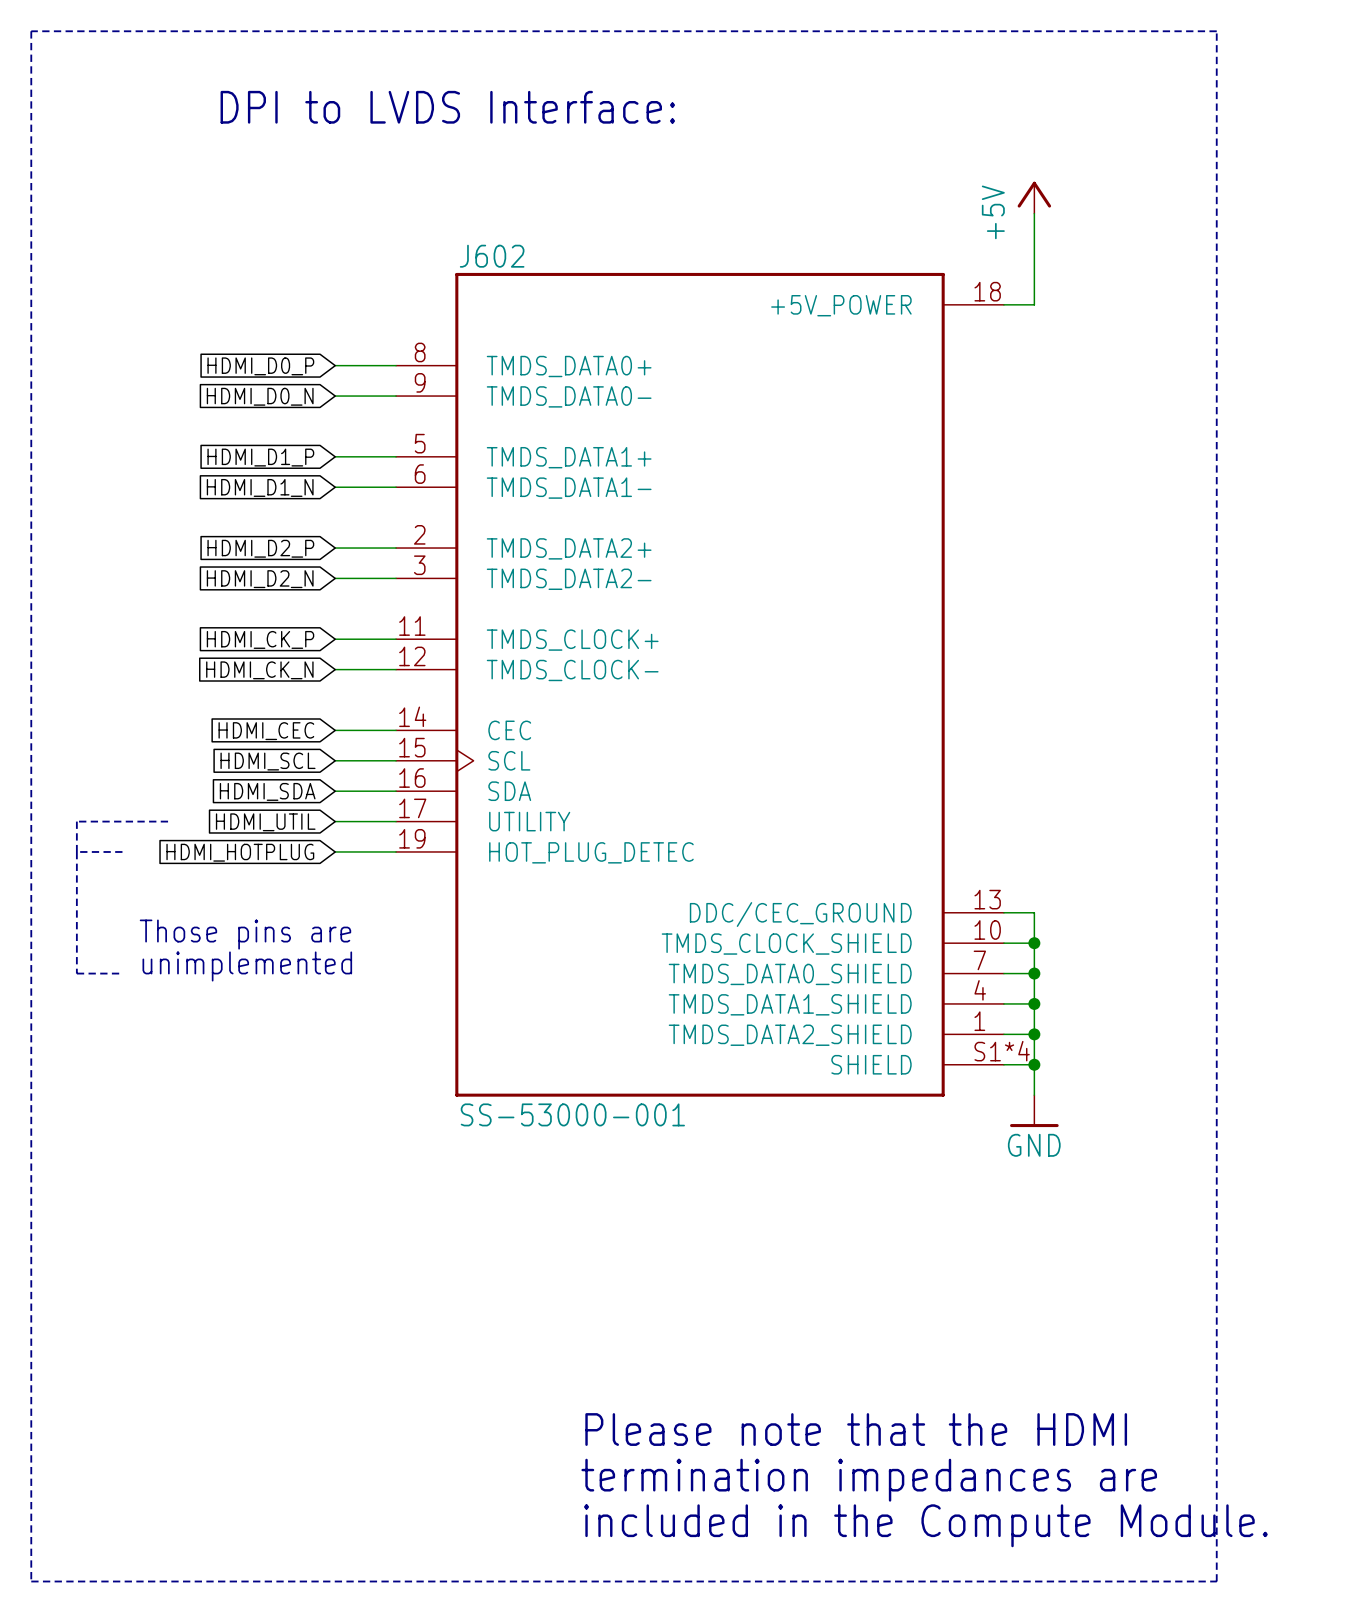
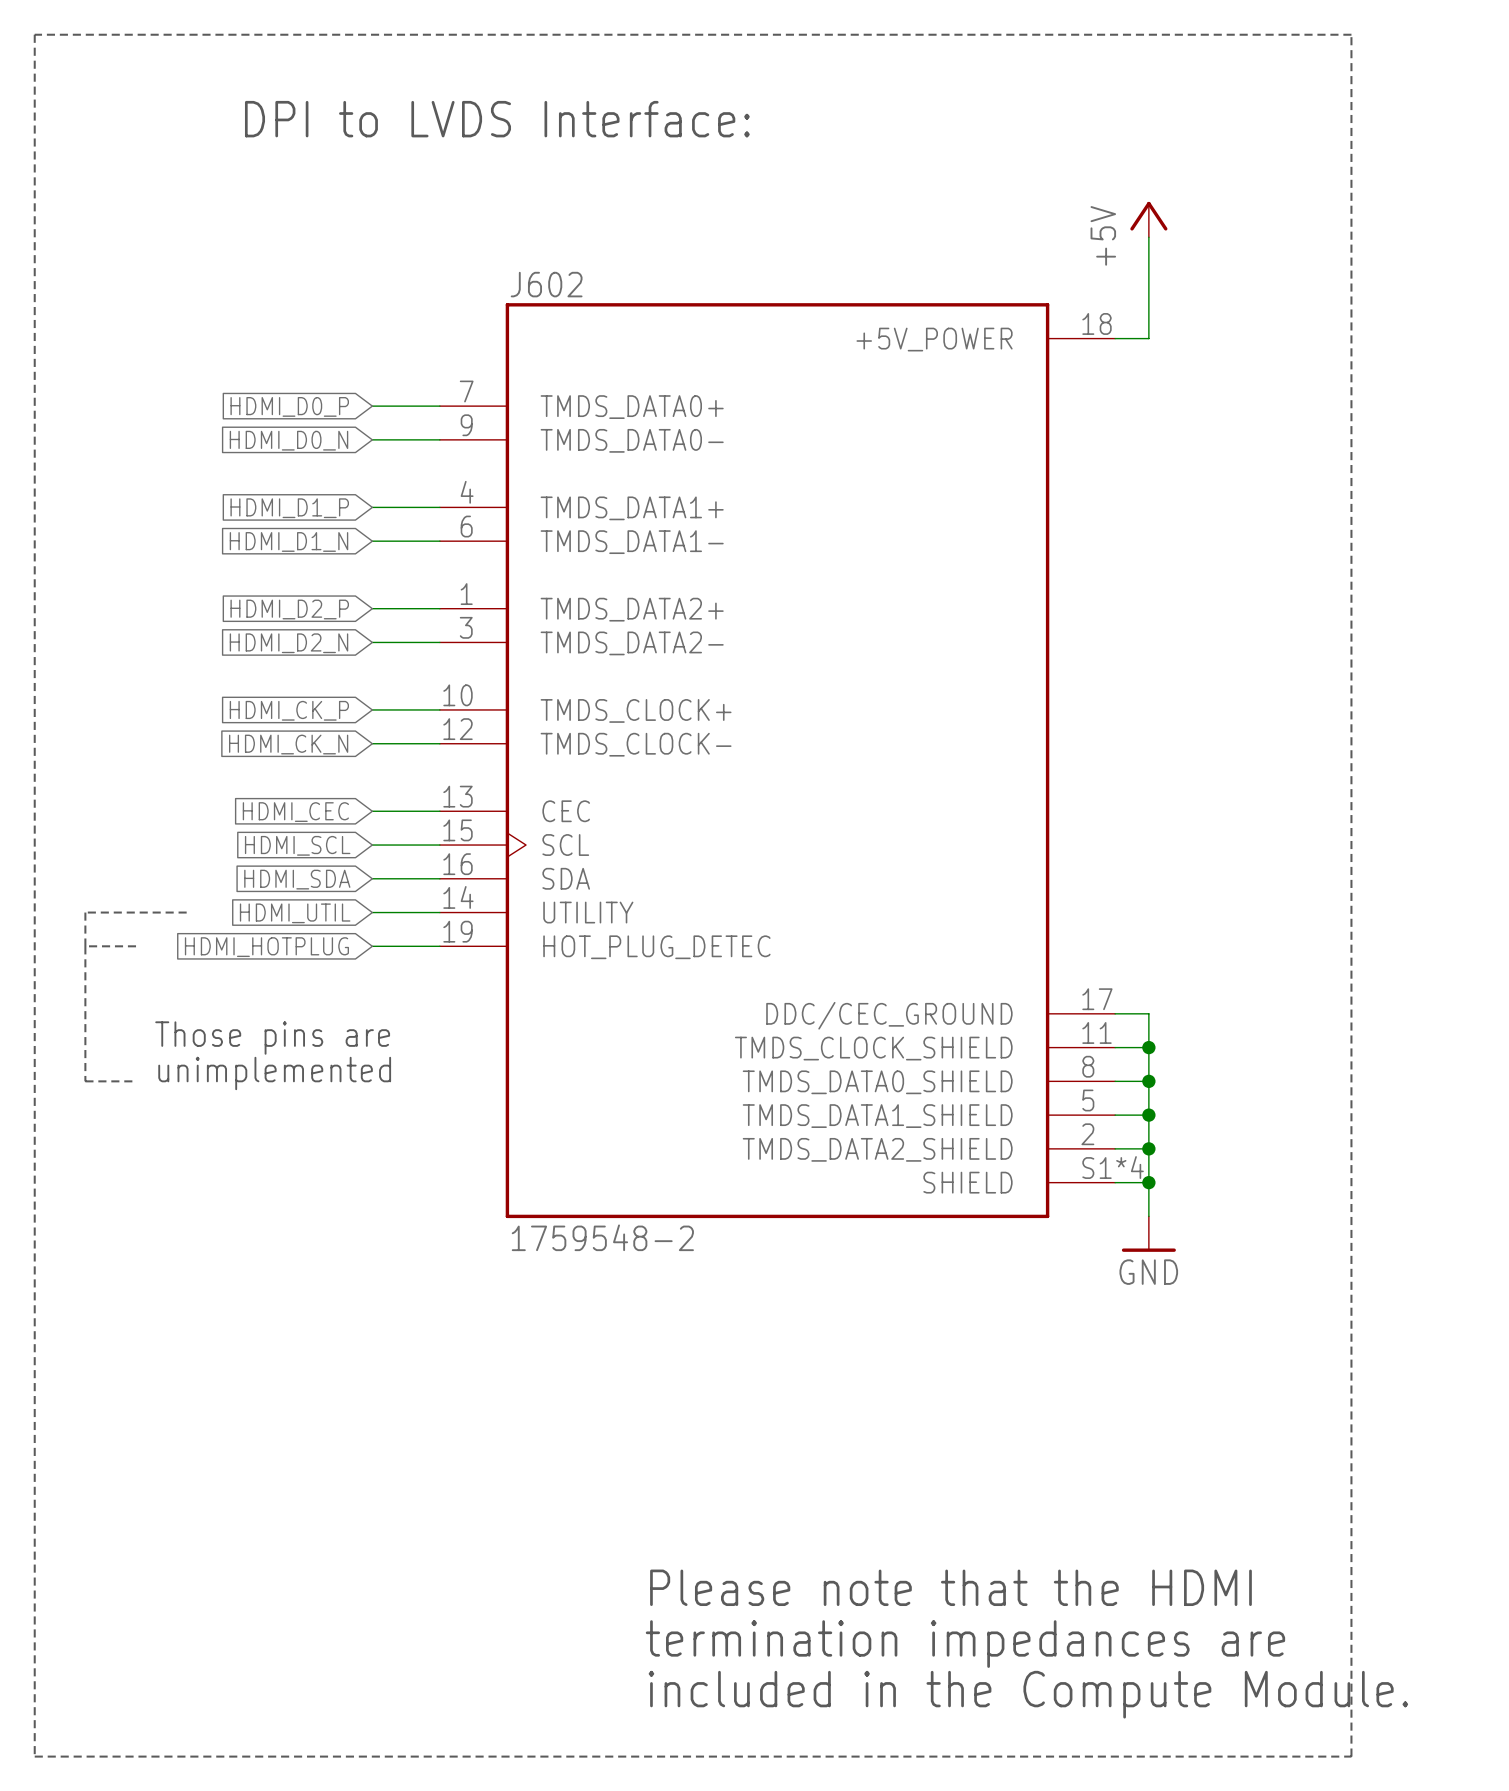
J602 symbol: [396, 272, 1004, 1097] -> [439, 303, 1116, 1219]
J602 value: SS-53000-001 (572, 1114) -> 1759548-2 (602, 1237)

